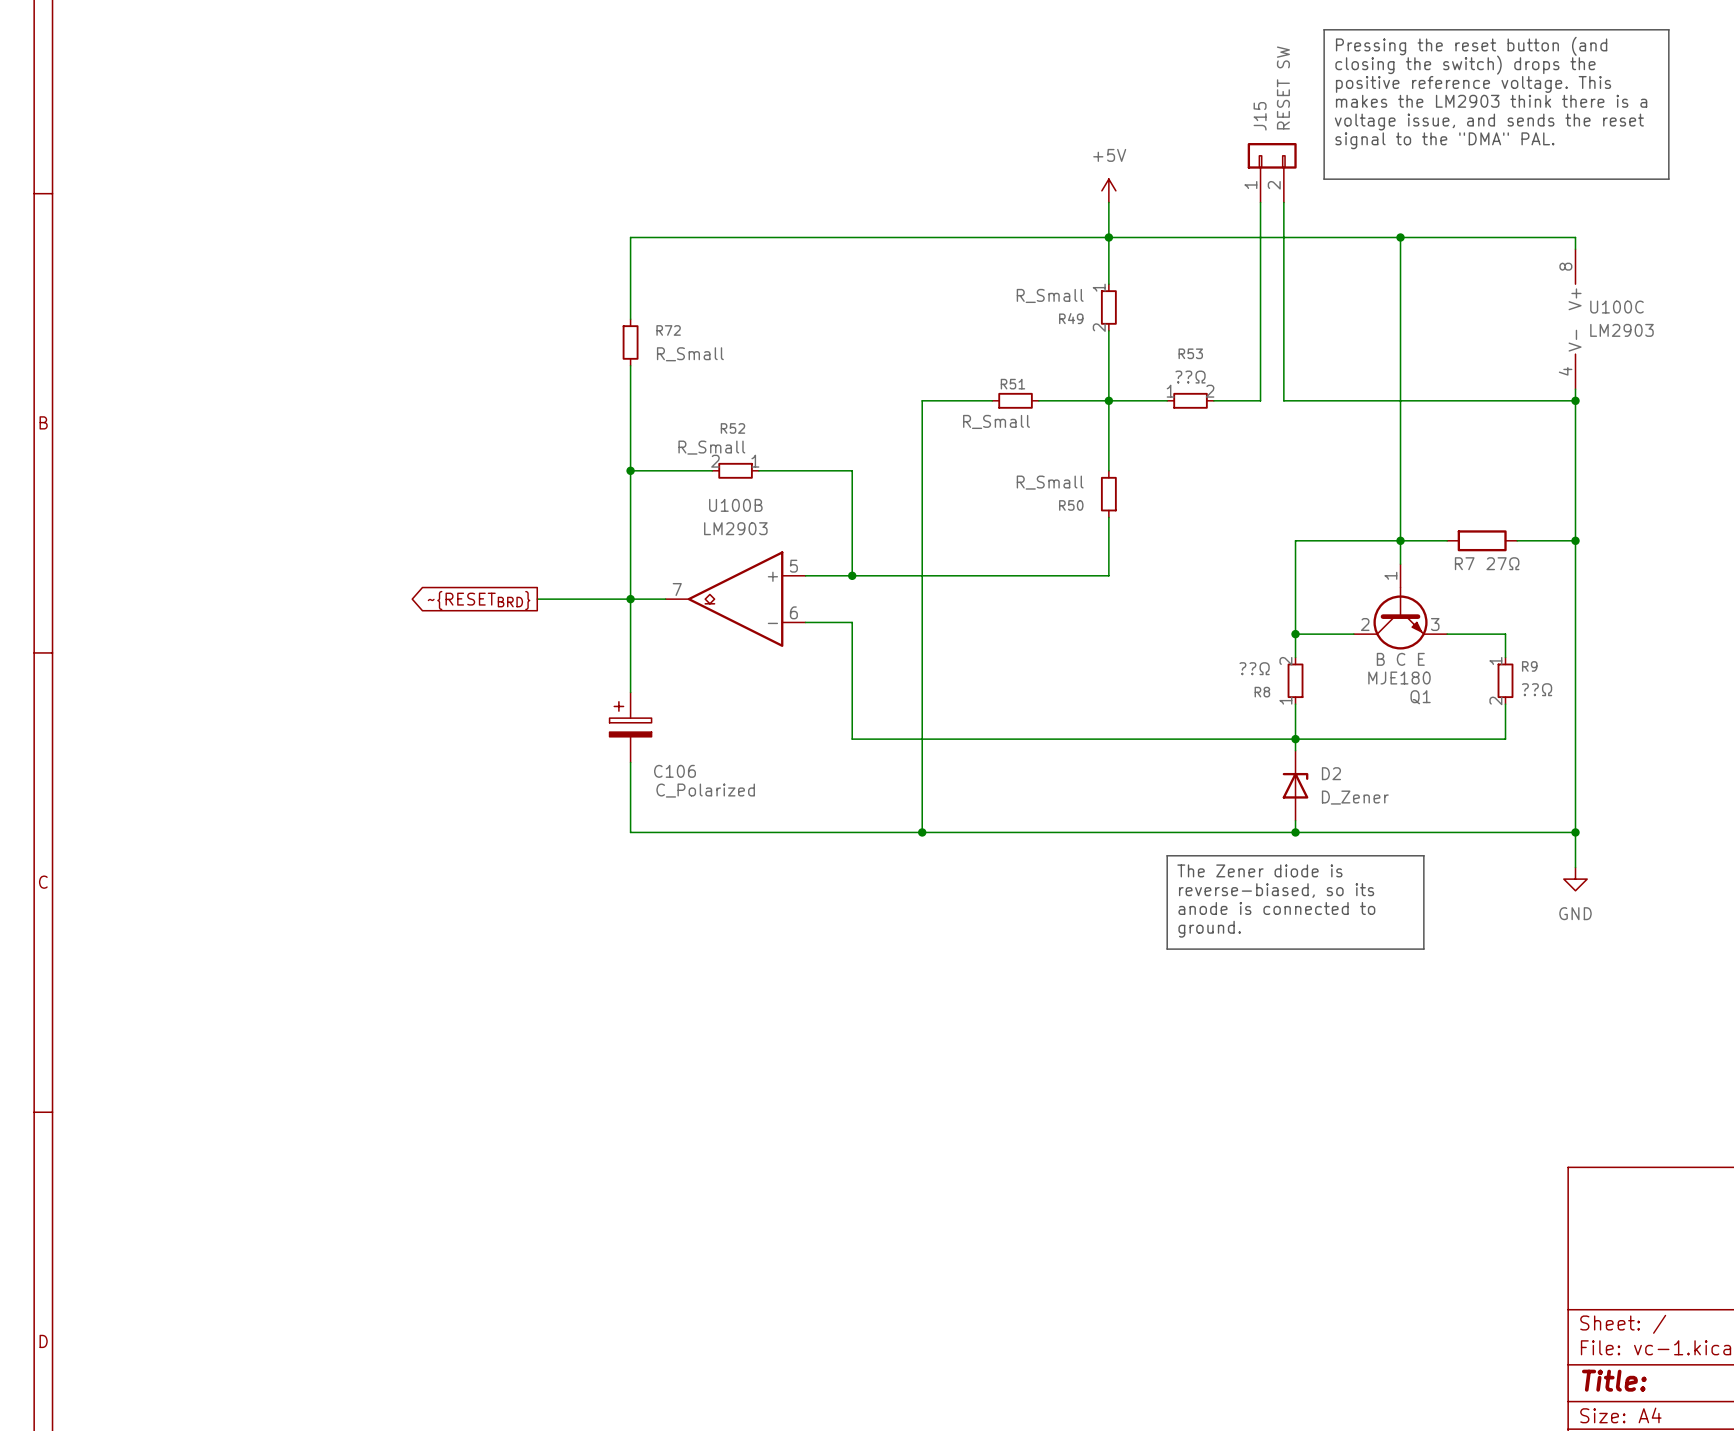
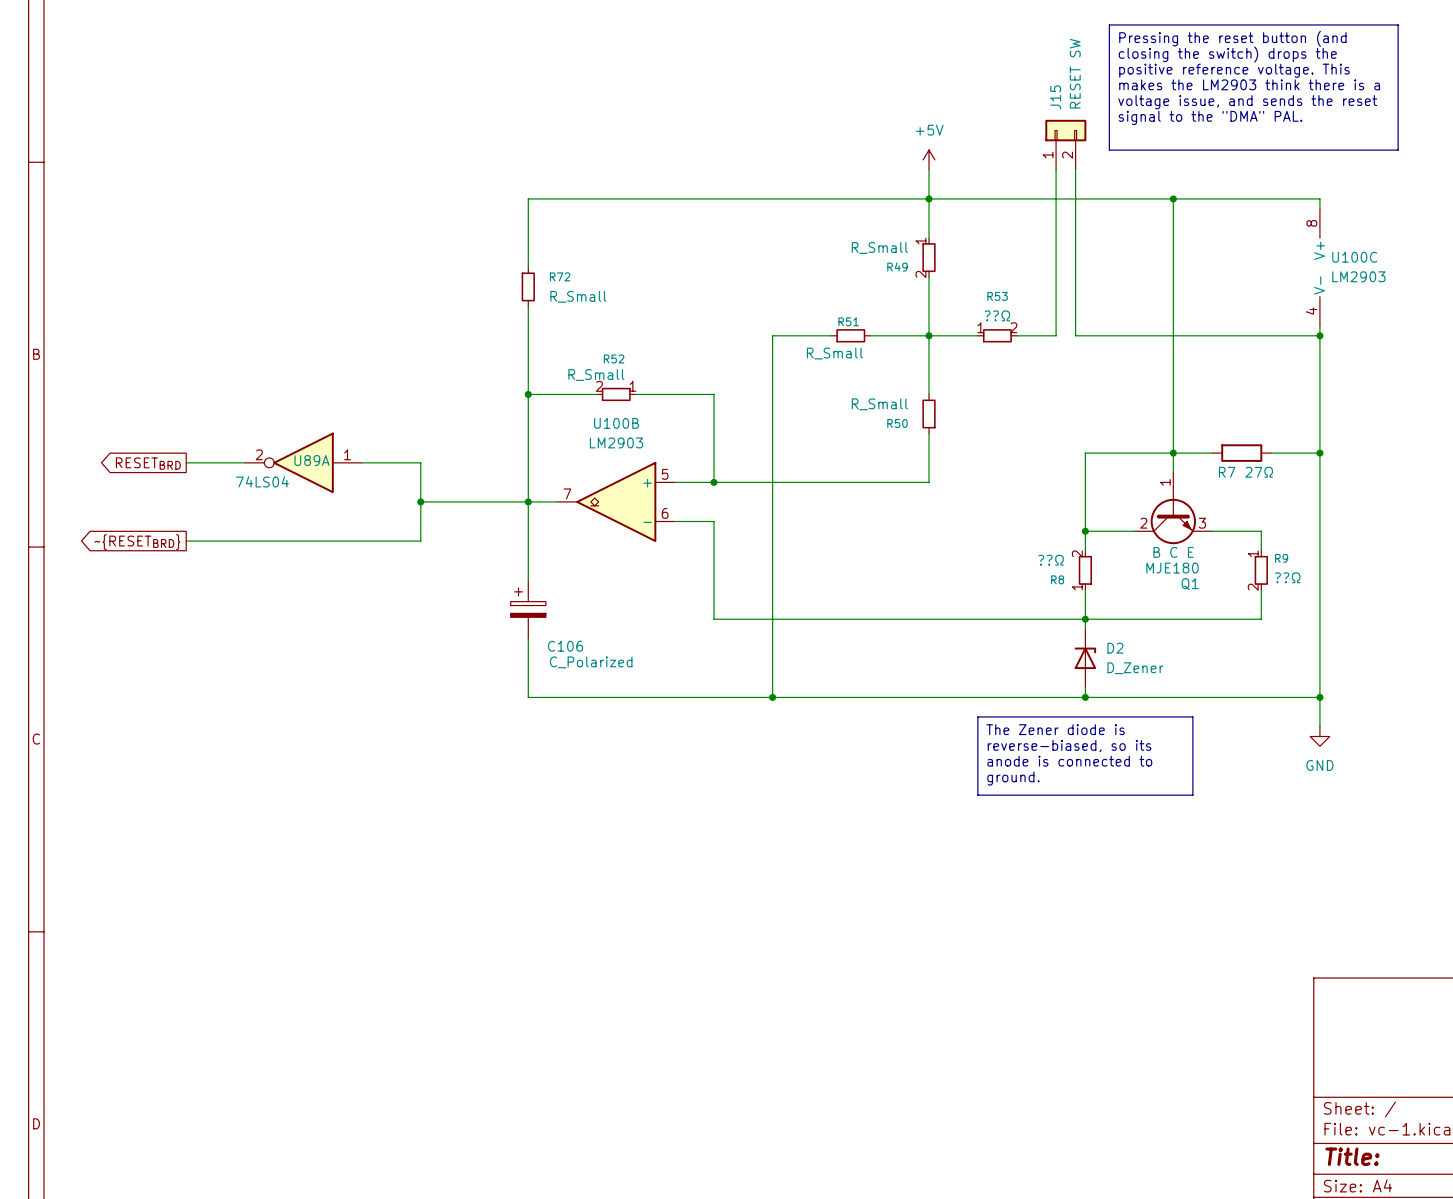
wire: none -> (186, 462) (244, 462)
U89A: none -> 74LS04 (303, 462)
wire: none -> (362, 462) (420, 462) (420, 541) (186, 541)
global label: none -> RESETBRD (148, 463)
wire: none -> (420, 501) (450, 501)
junction: none -> (420, 501)
global label: ~{RESETBRD} (479, 600) -> none
global label: none -> ~{RESETBRD} (137, 542)

